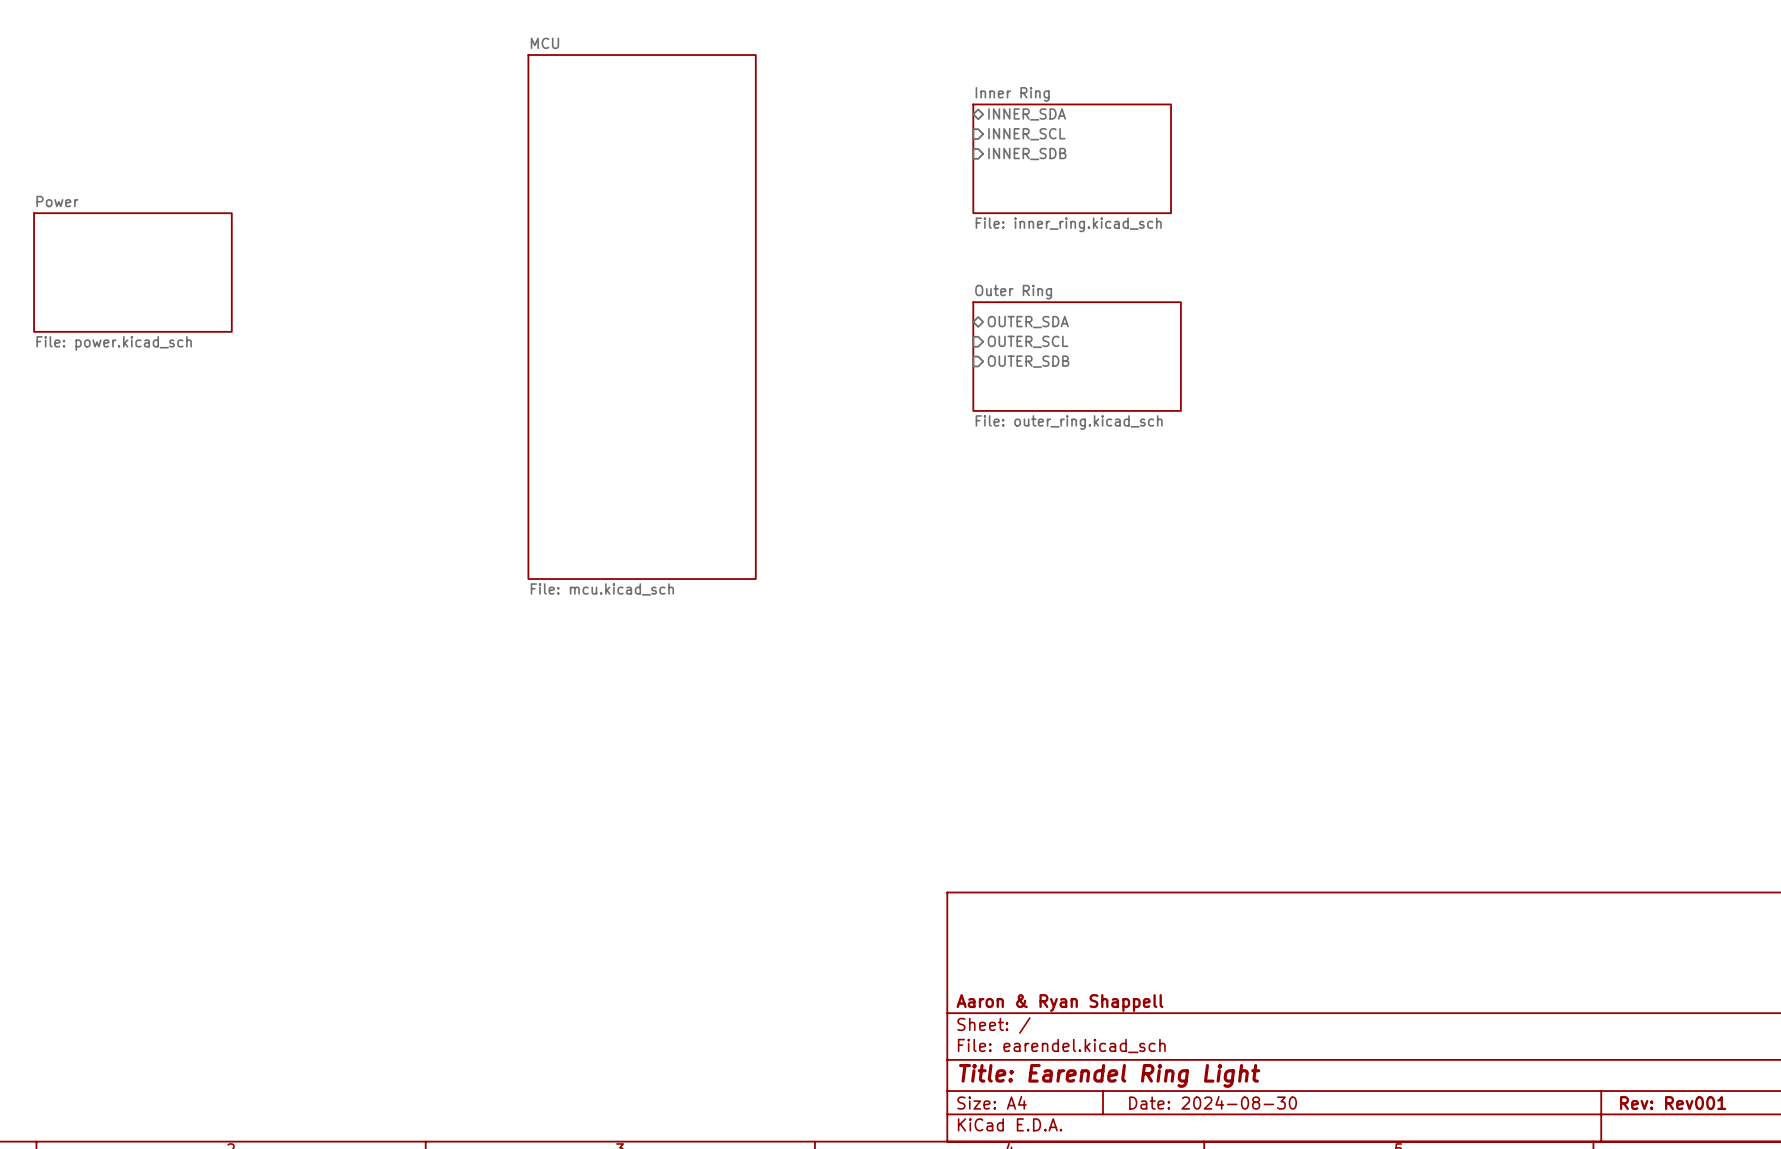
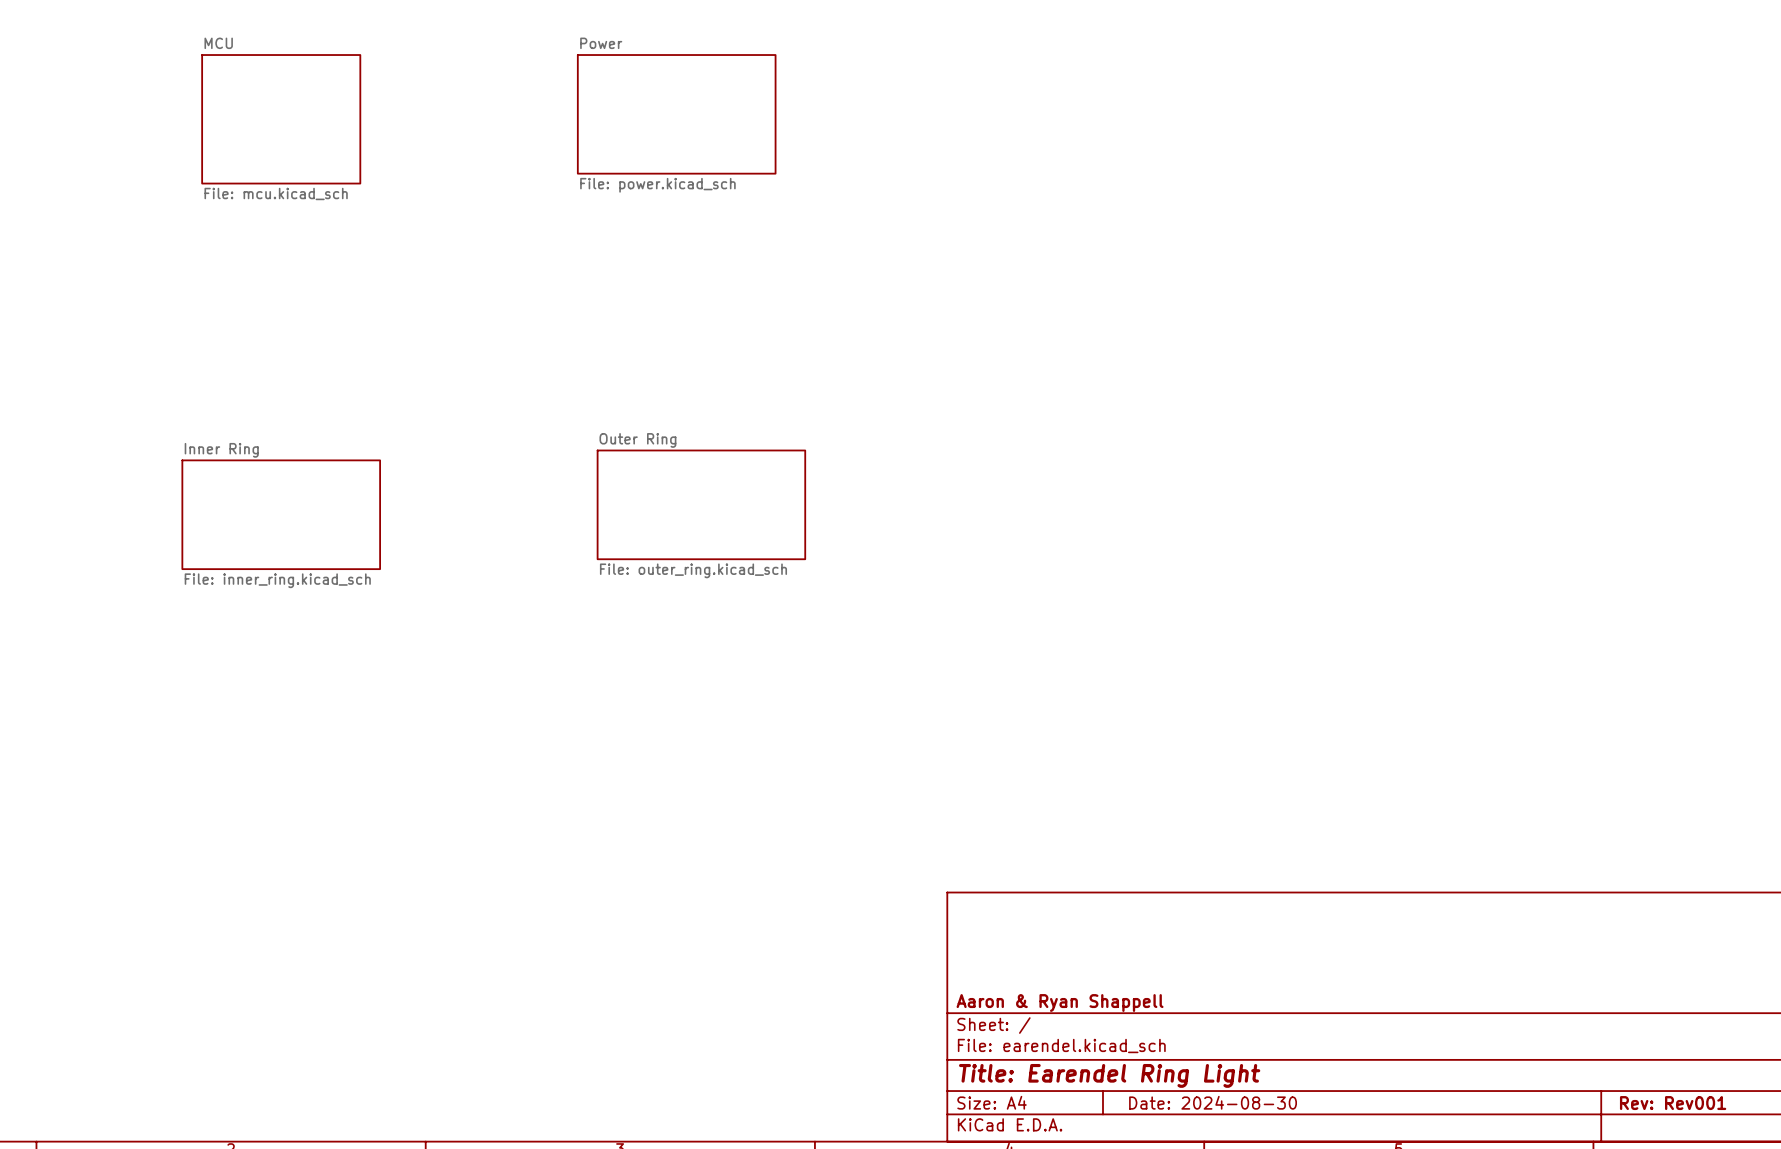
sheet Power: none -> File: power.kicad_sch (676, 114)
sheet pin: INNER_SDA (1027, 114) -> none
sheet MCU: none -> File: mcu.kicad_sch (281, 119)
sheet pin: INNER_SCL (1026, 134) -> none
sheet pin: INNER_SDB (1027, 153) -> none
sheet Inner Ring: File: inner_ring.kicad_sch (1072, 158) -> none
sheet Power: File: power.kicad_sch (132, 272) -> none
sheet MCU: File: mcu.kicad_sch (642, 317) -> none
sheet pin: OUTER_SDA (1028, 322) -> none
sheet pin: OUTER_SCL (1028, 341) -> none
sheet Outer Ring: File: outer_ring.kicad_sch (1077, 356) -> none
sheet pin: OUTER_SDB (1028, 361) -> none
sheet Outer Ring: none -> File: outer_ring.kicad_sch (701, 504)
sheet Inner Ring: none -> File: inner_ring.kicad_sch (281, 514)

